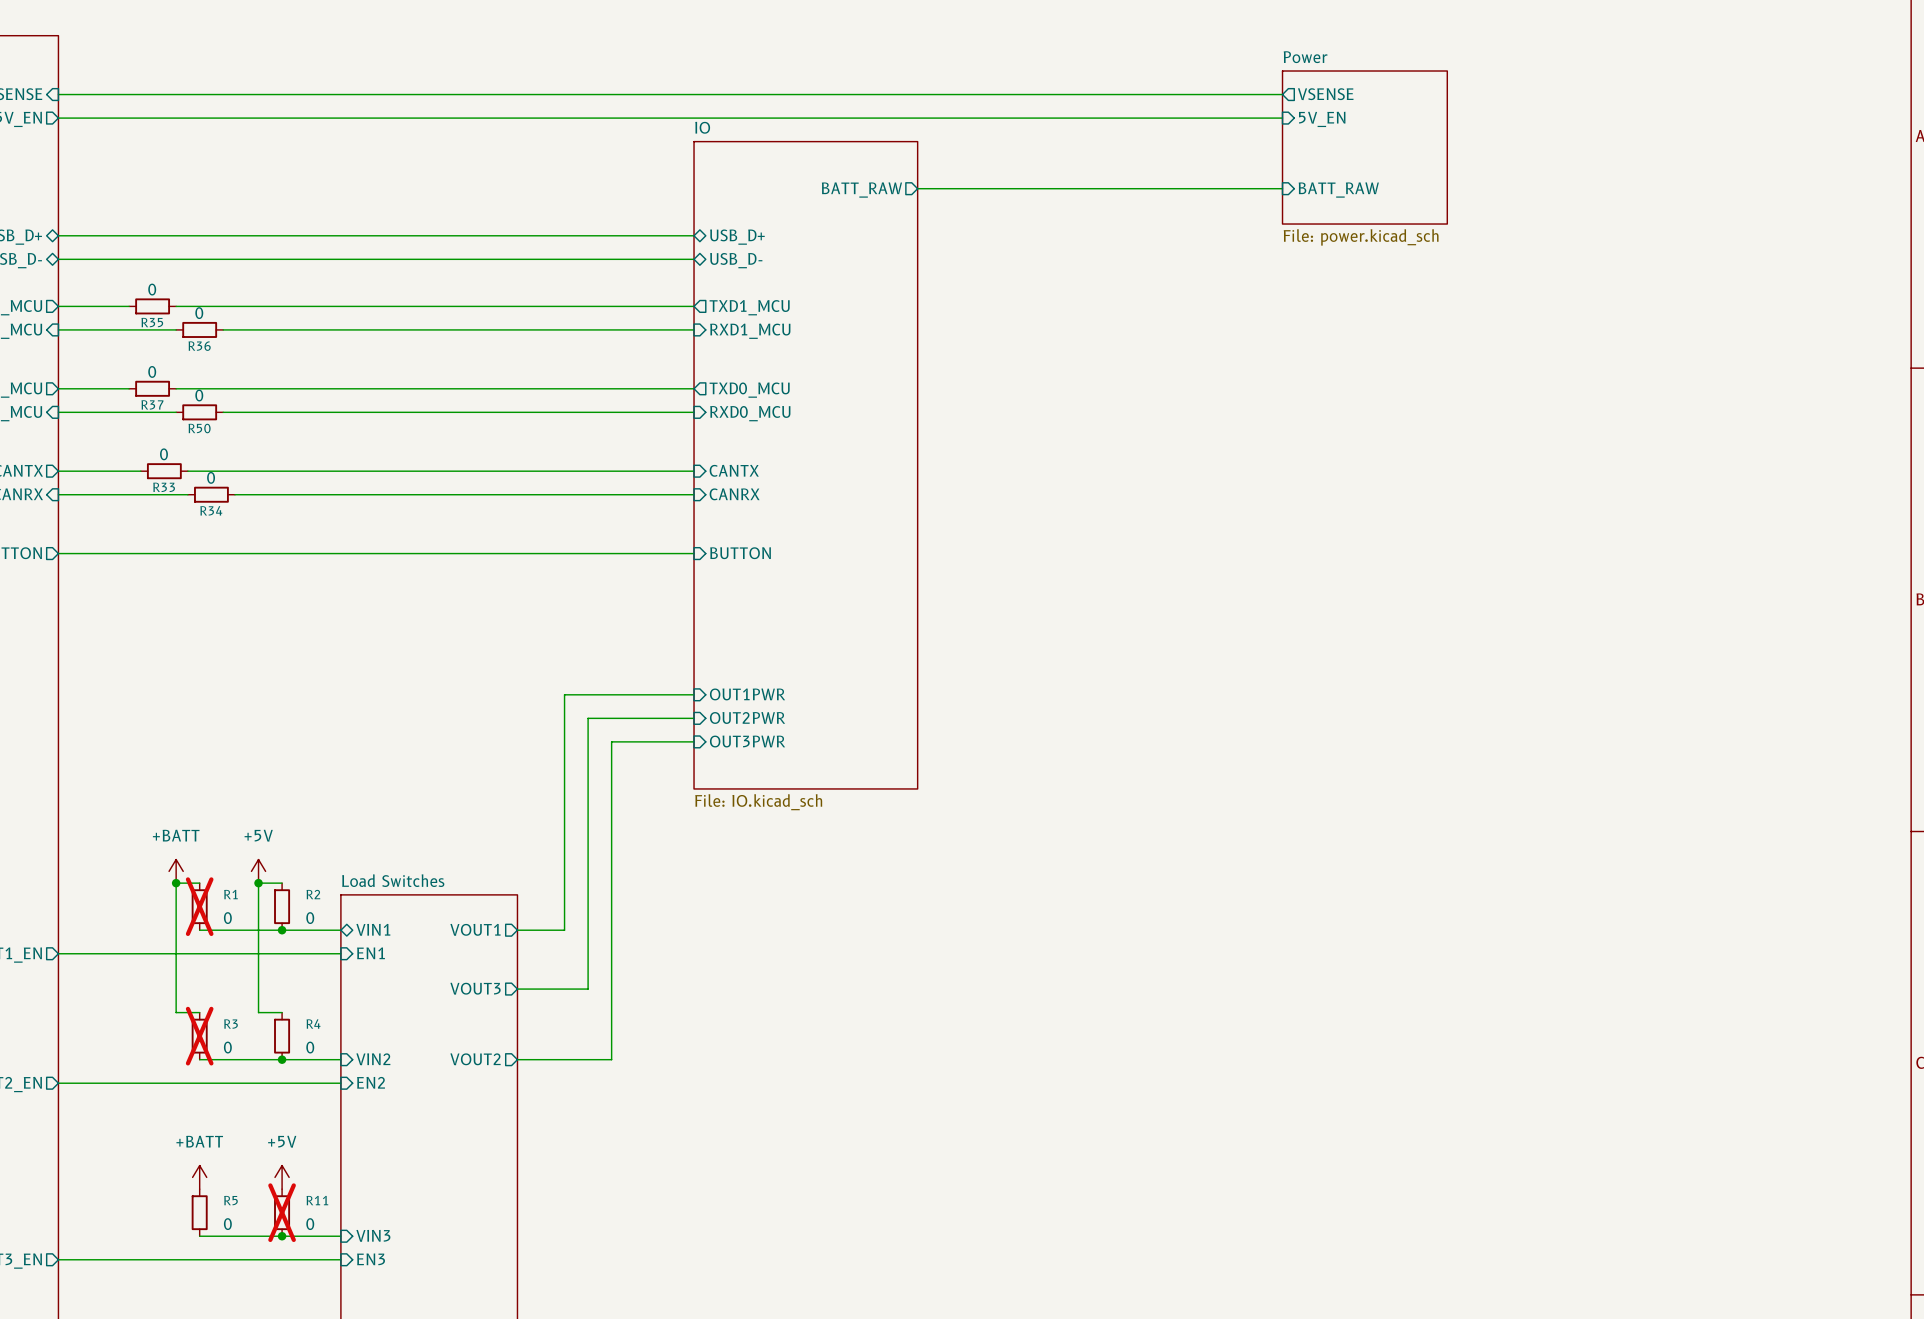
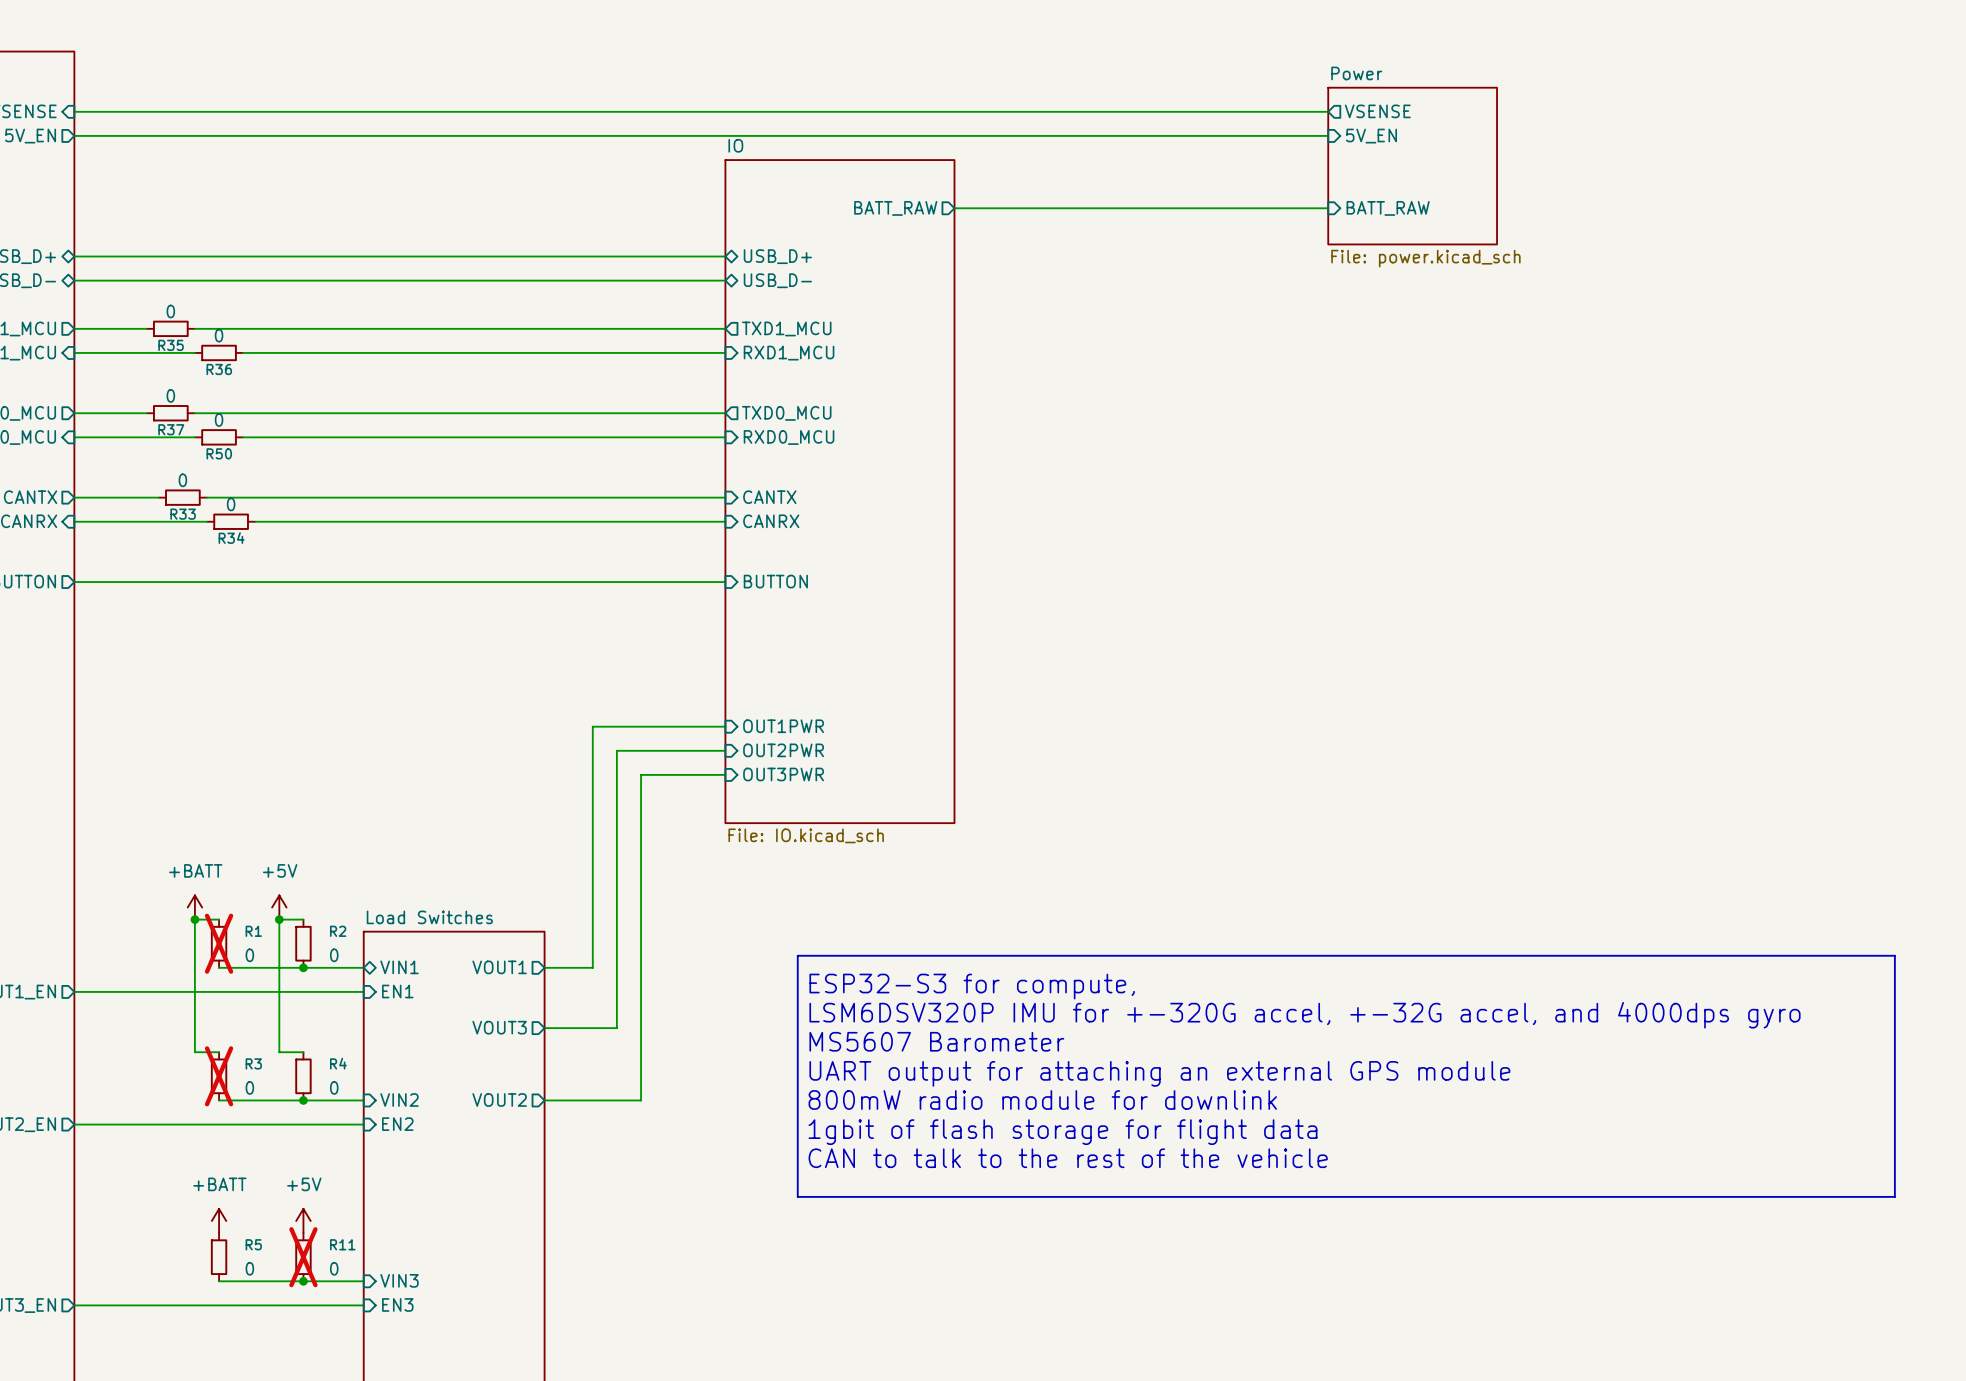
line: none -> (797, 955) (1894, 955) (1894, 1196) (797, 1196) (797, 955)
text: none -> ESP32-S3 for compute, (972, 986)
text: none -> LSM6DSV320P IMU for +-320G accel, +-32G accel, and 4000dps gyro (1304, 1015)
text: none -> MS5607 Barometer (936, 1041)
text: none -> UART output for attaching an external GPS module (1159, 1073)
text: none -> 800mW radio module for downlink (1042, 1099)
text: none -> 1gbit of flash storage for flight data (1063, 1132)
text: none -> CAN to talk to the rest of the vehicle (1068, 1158)

